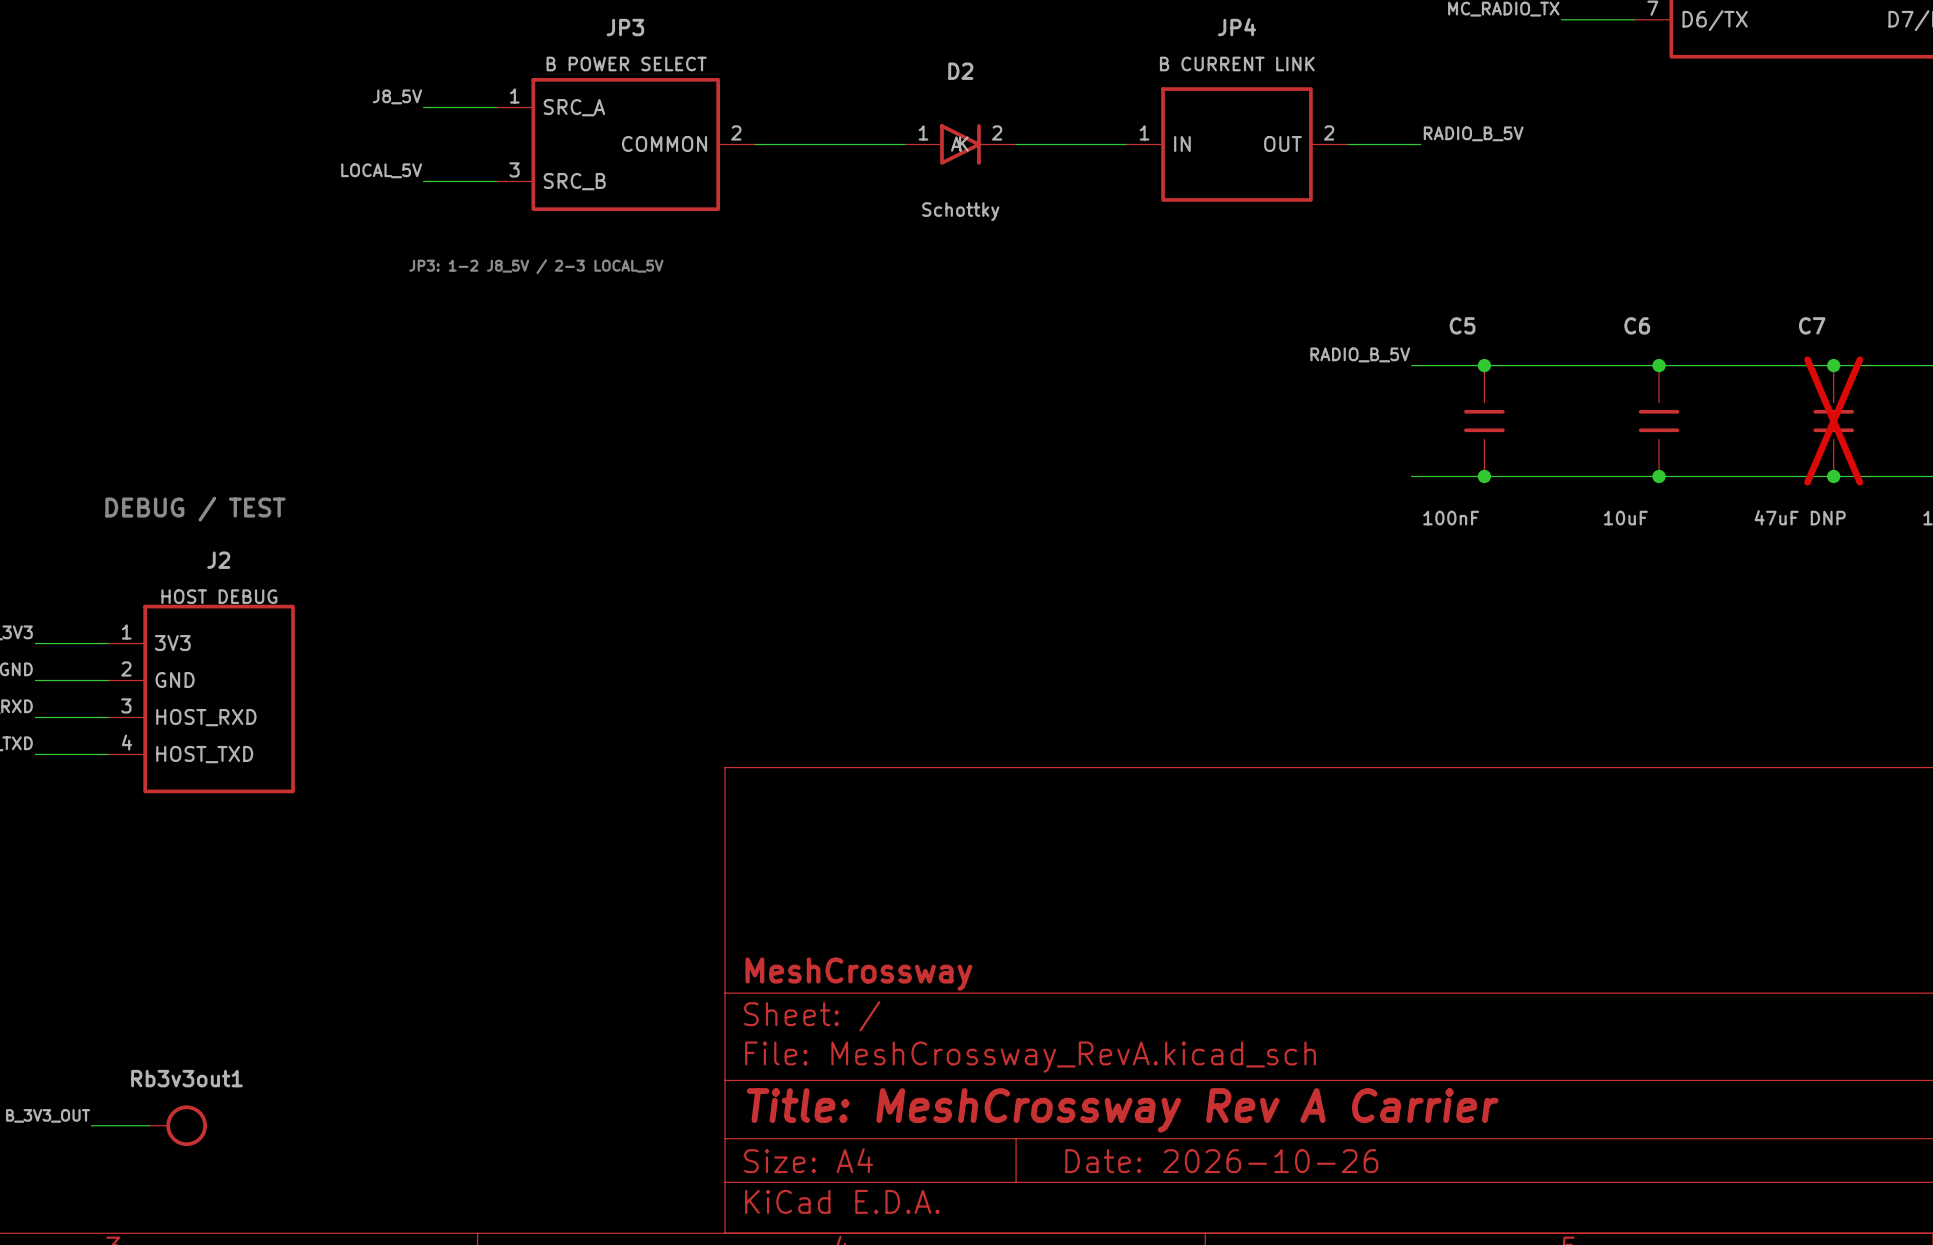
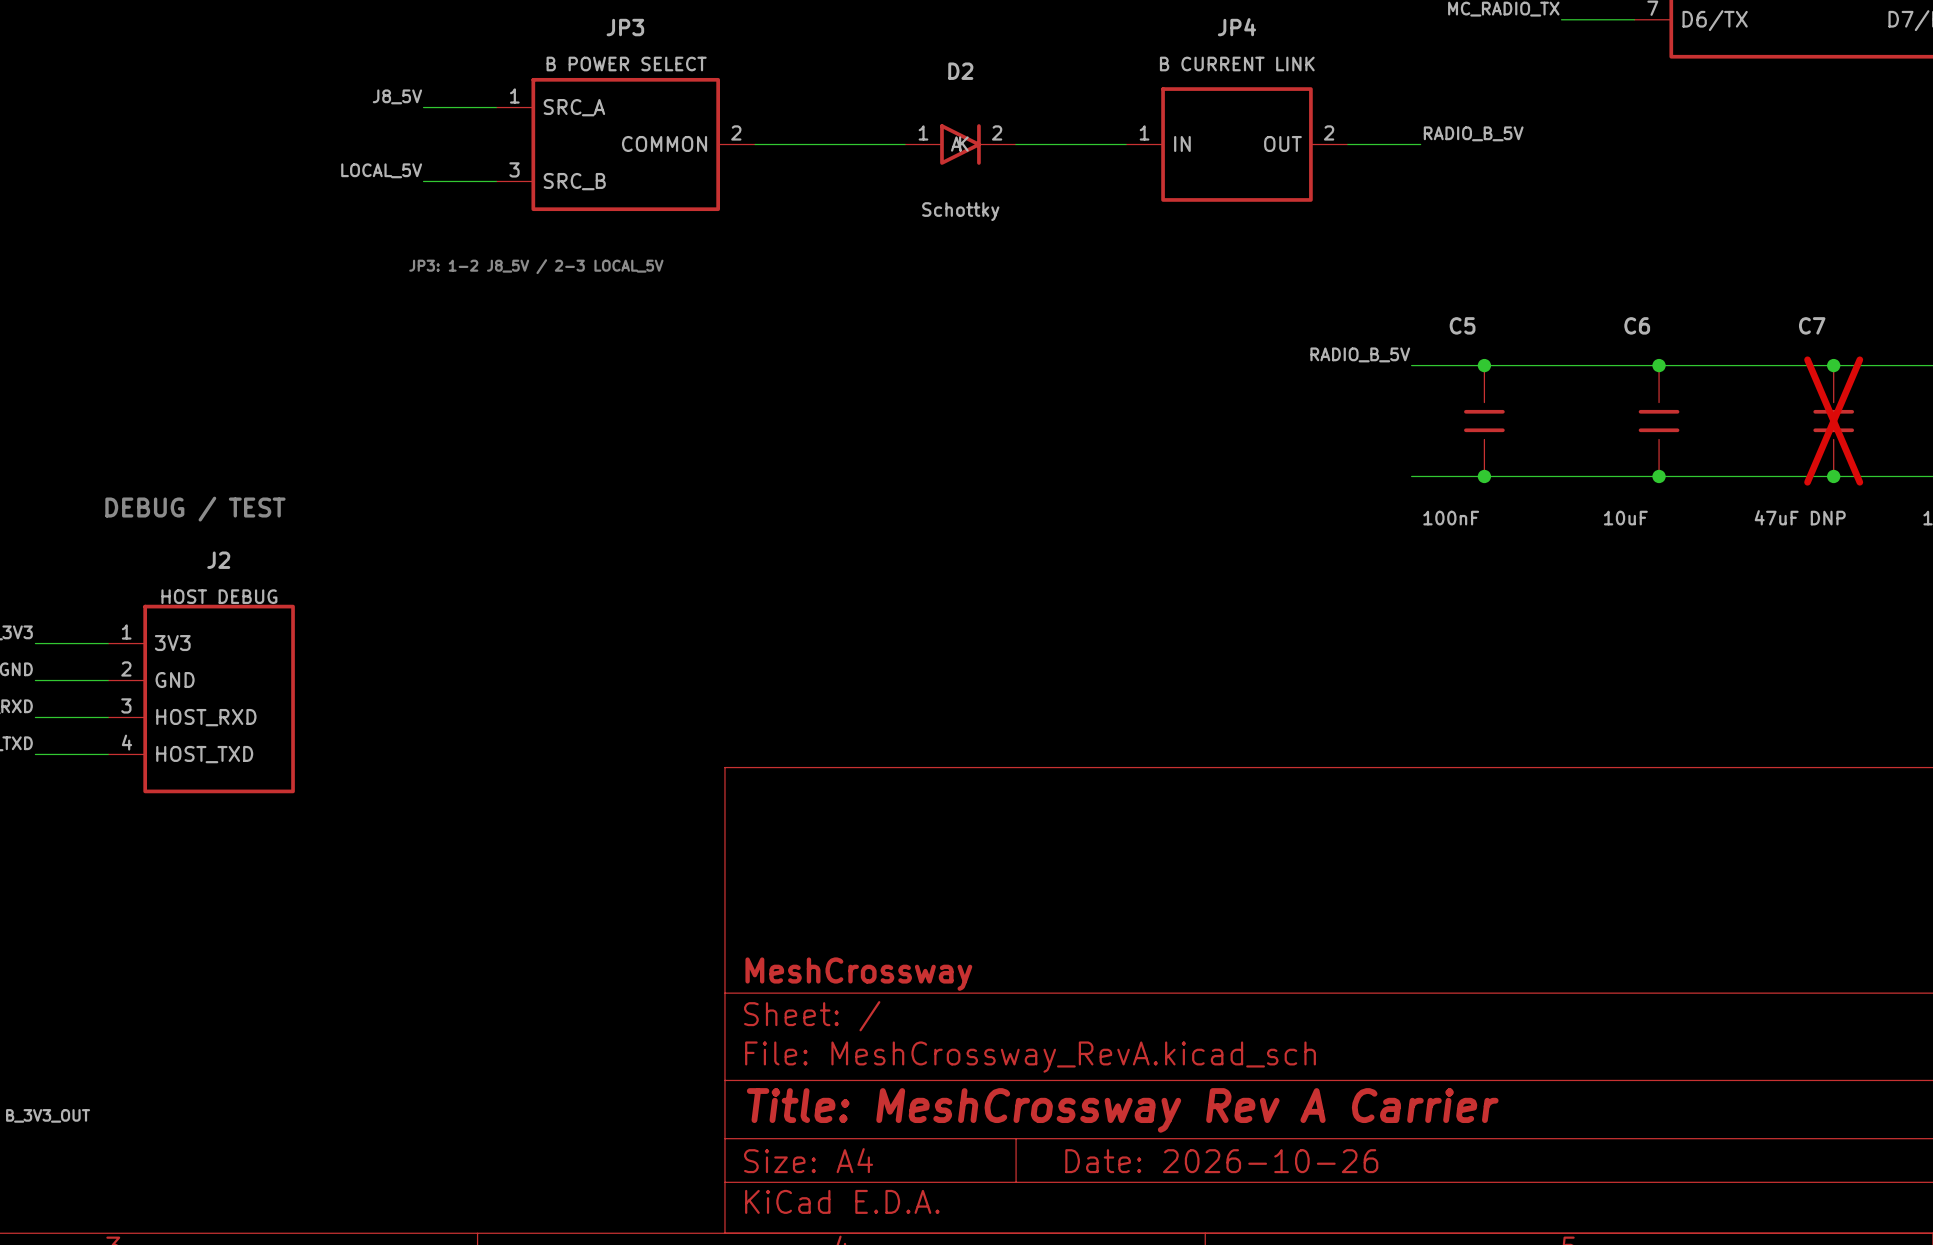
wire: (91, 1125) (149, 1125) -> none
Rb3v3out1: (178, 1125) -> none

